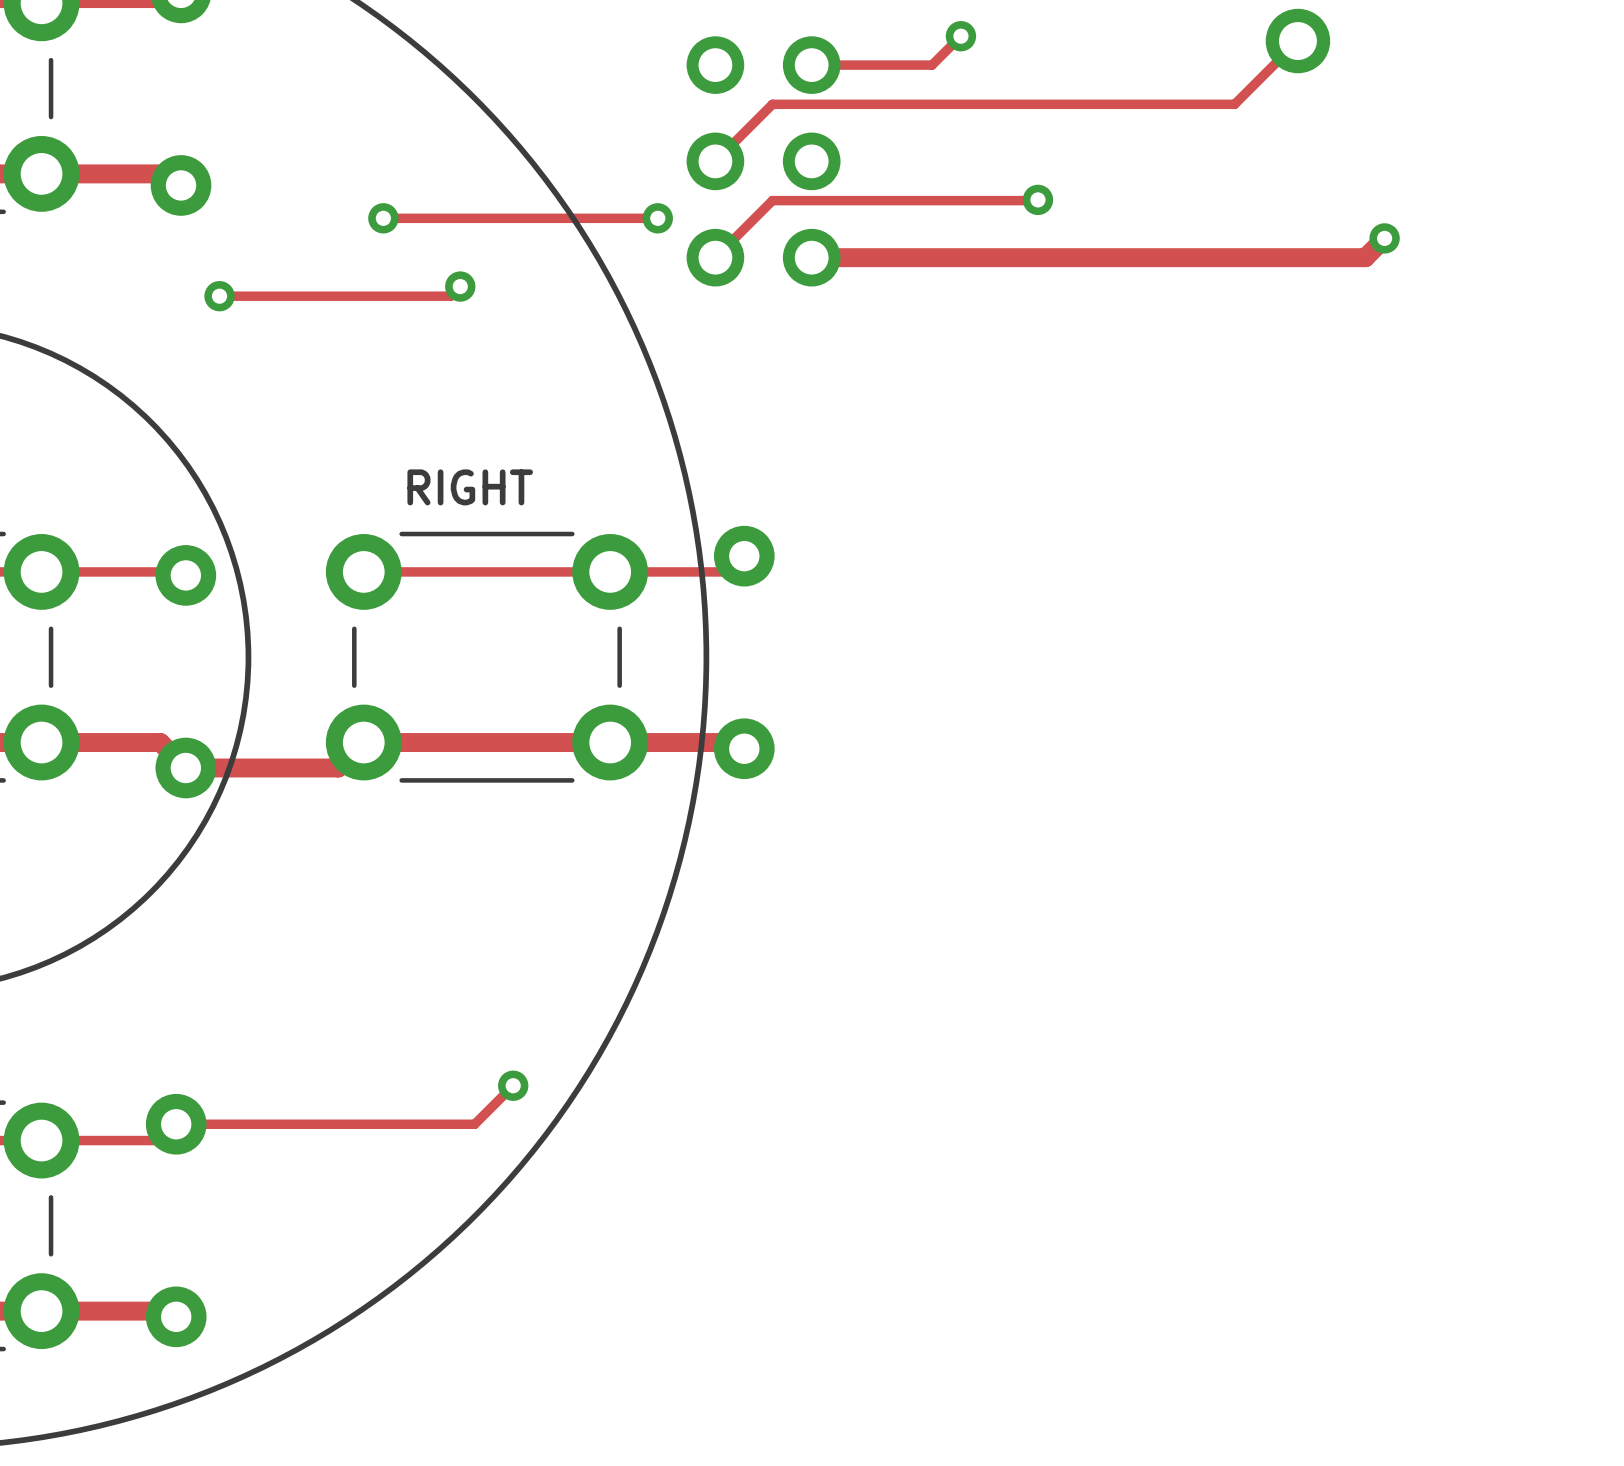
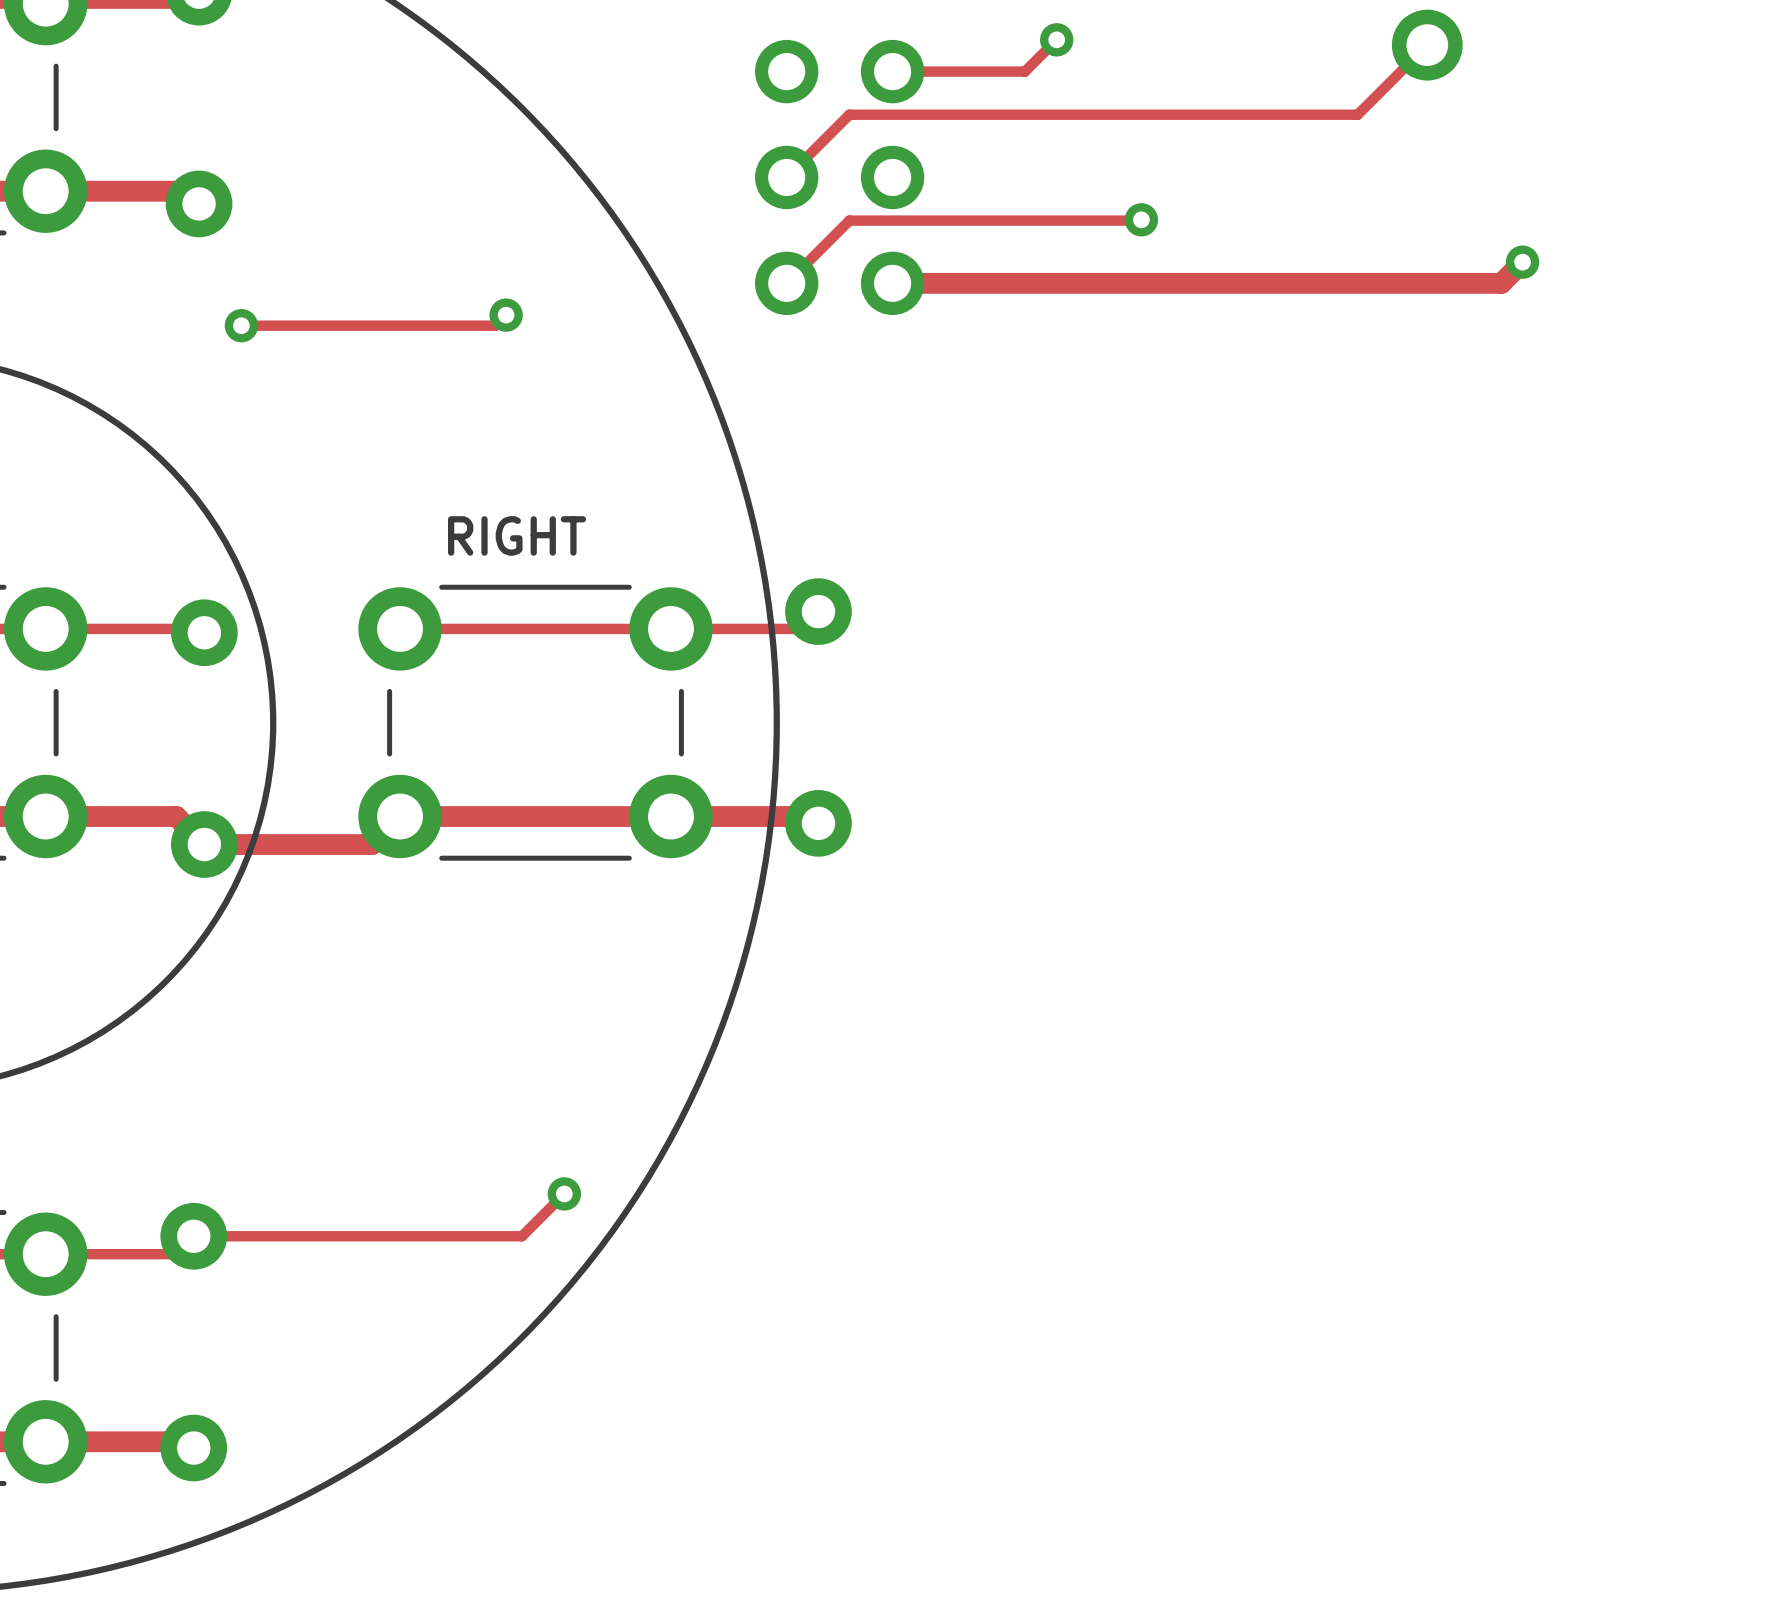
track: (383, 218) (657, 218) -> none
via: (383, 218) -> none
via: (657, 218) -> none

